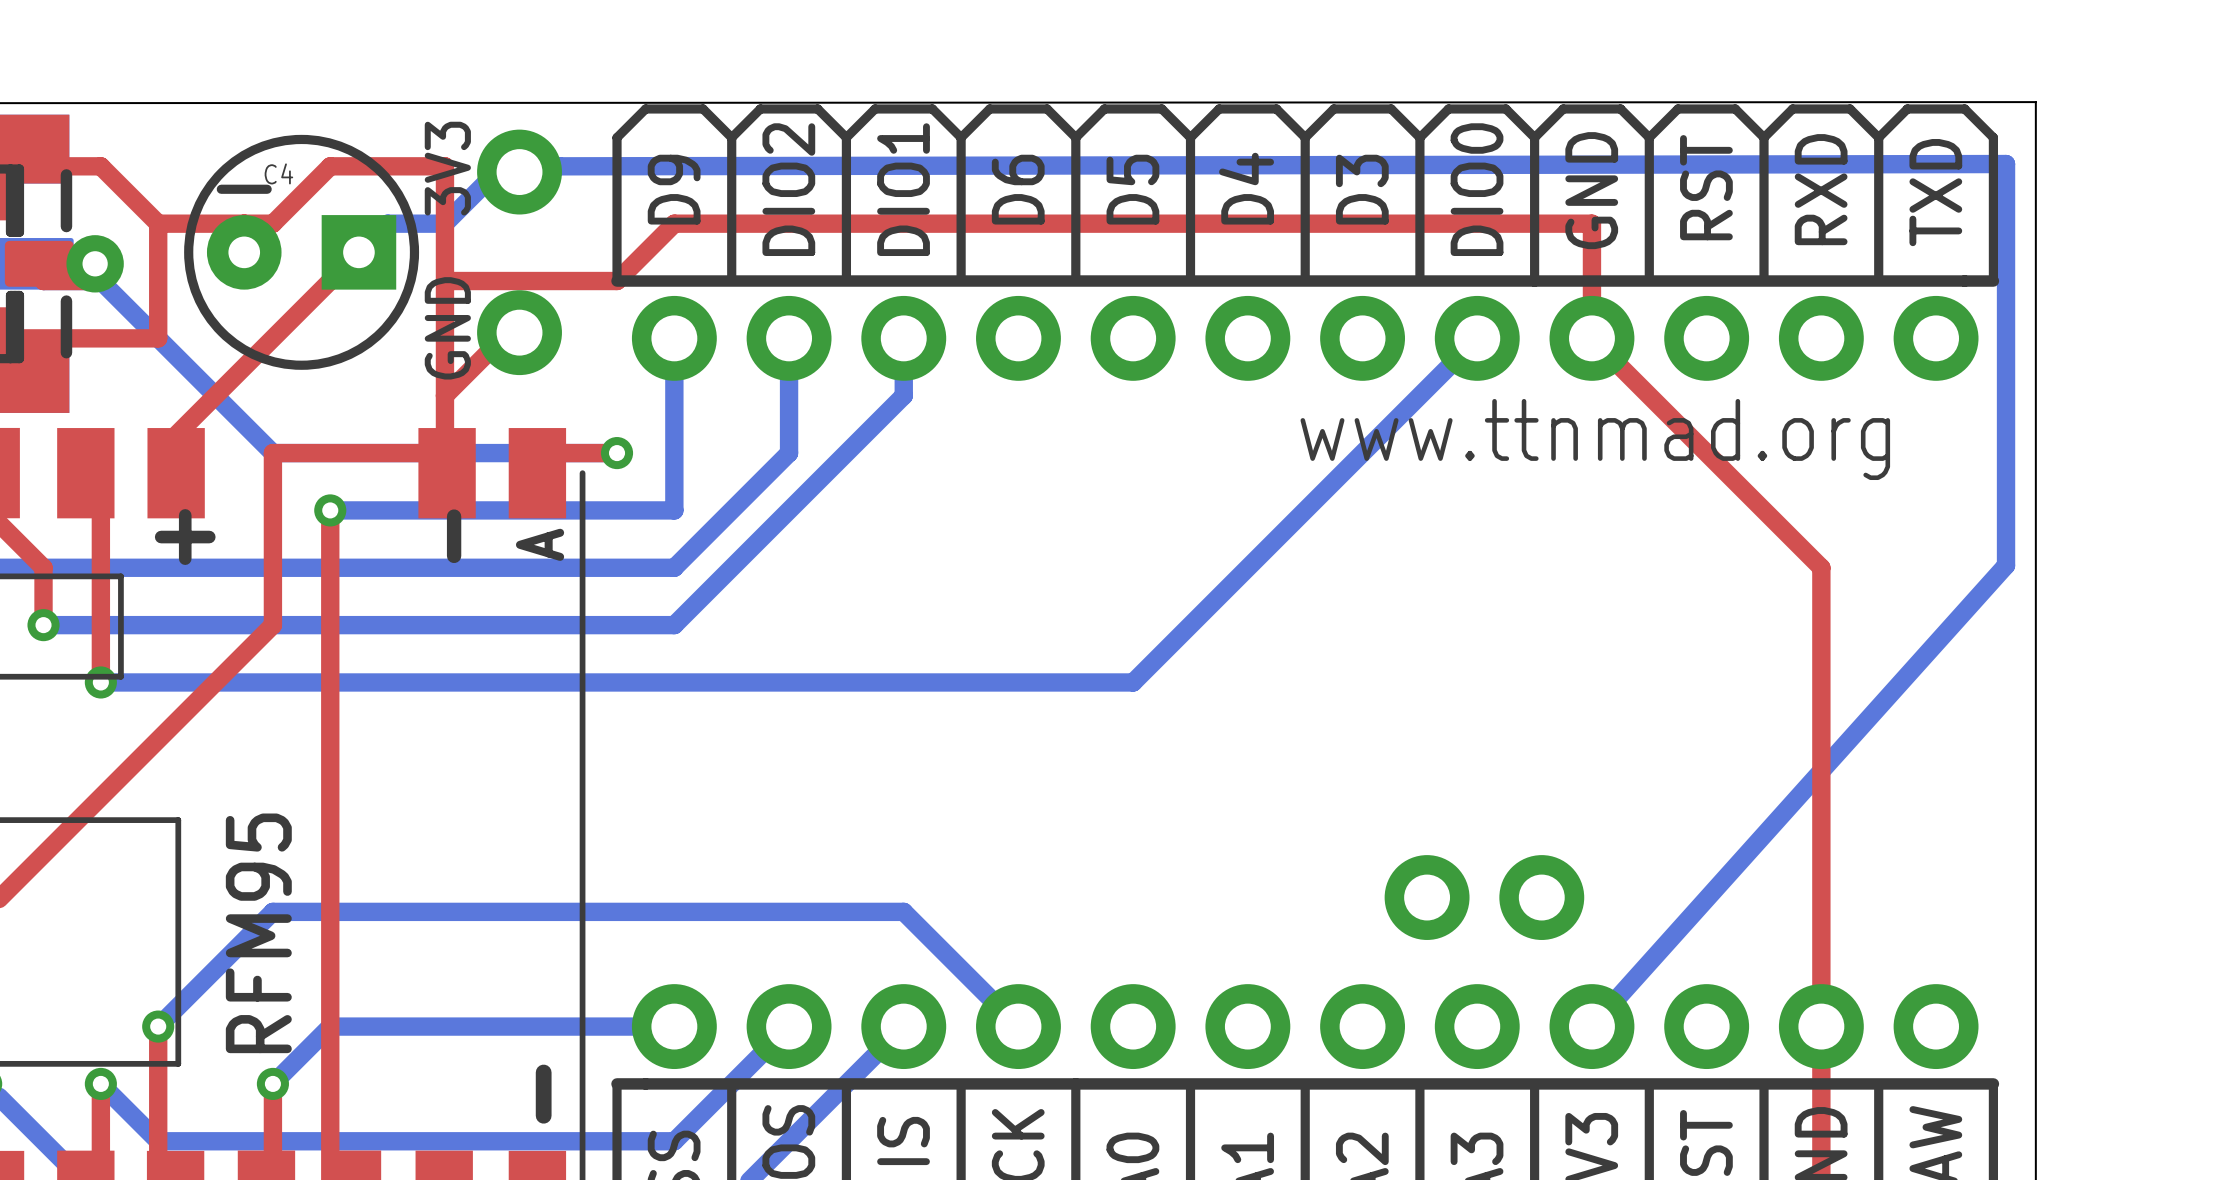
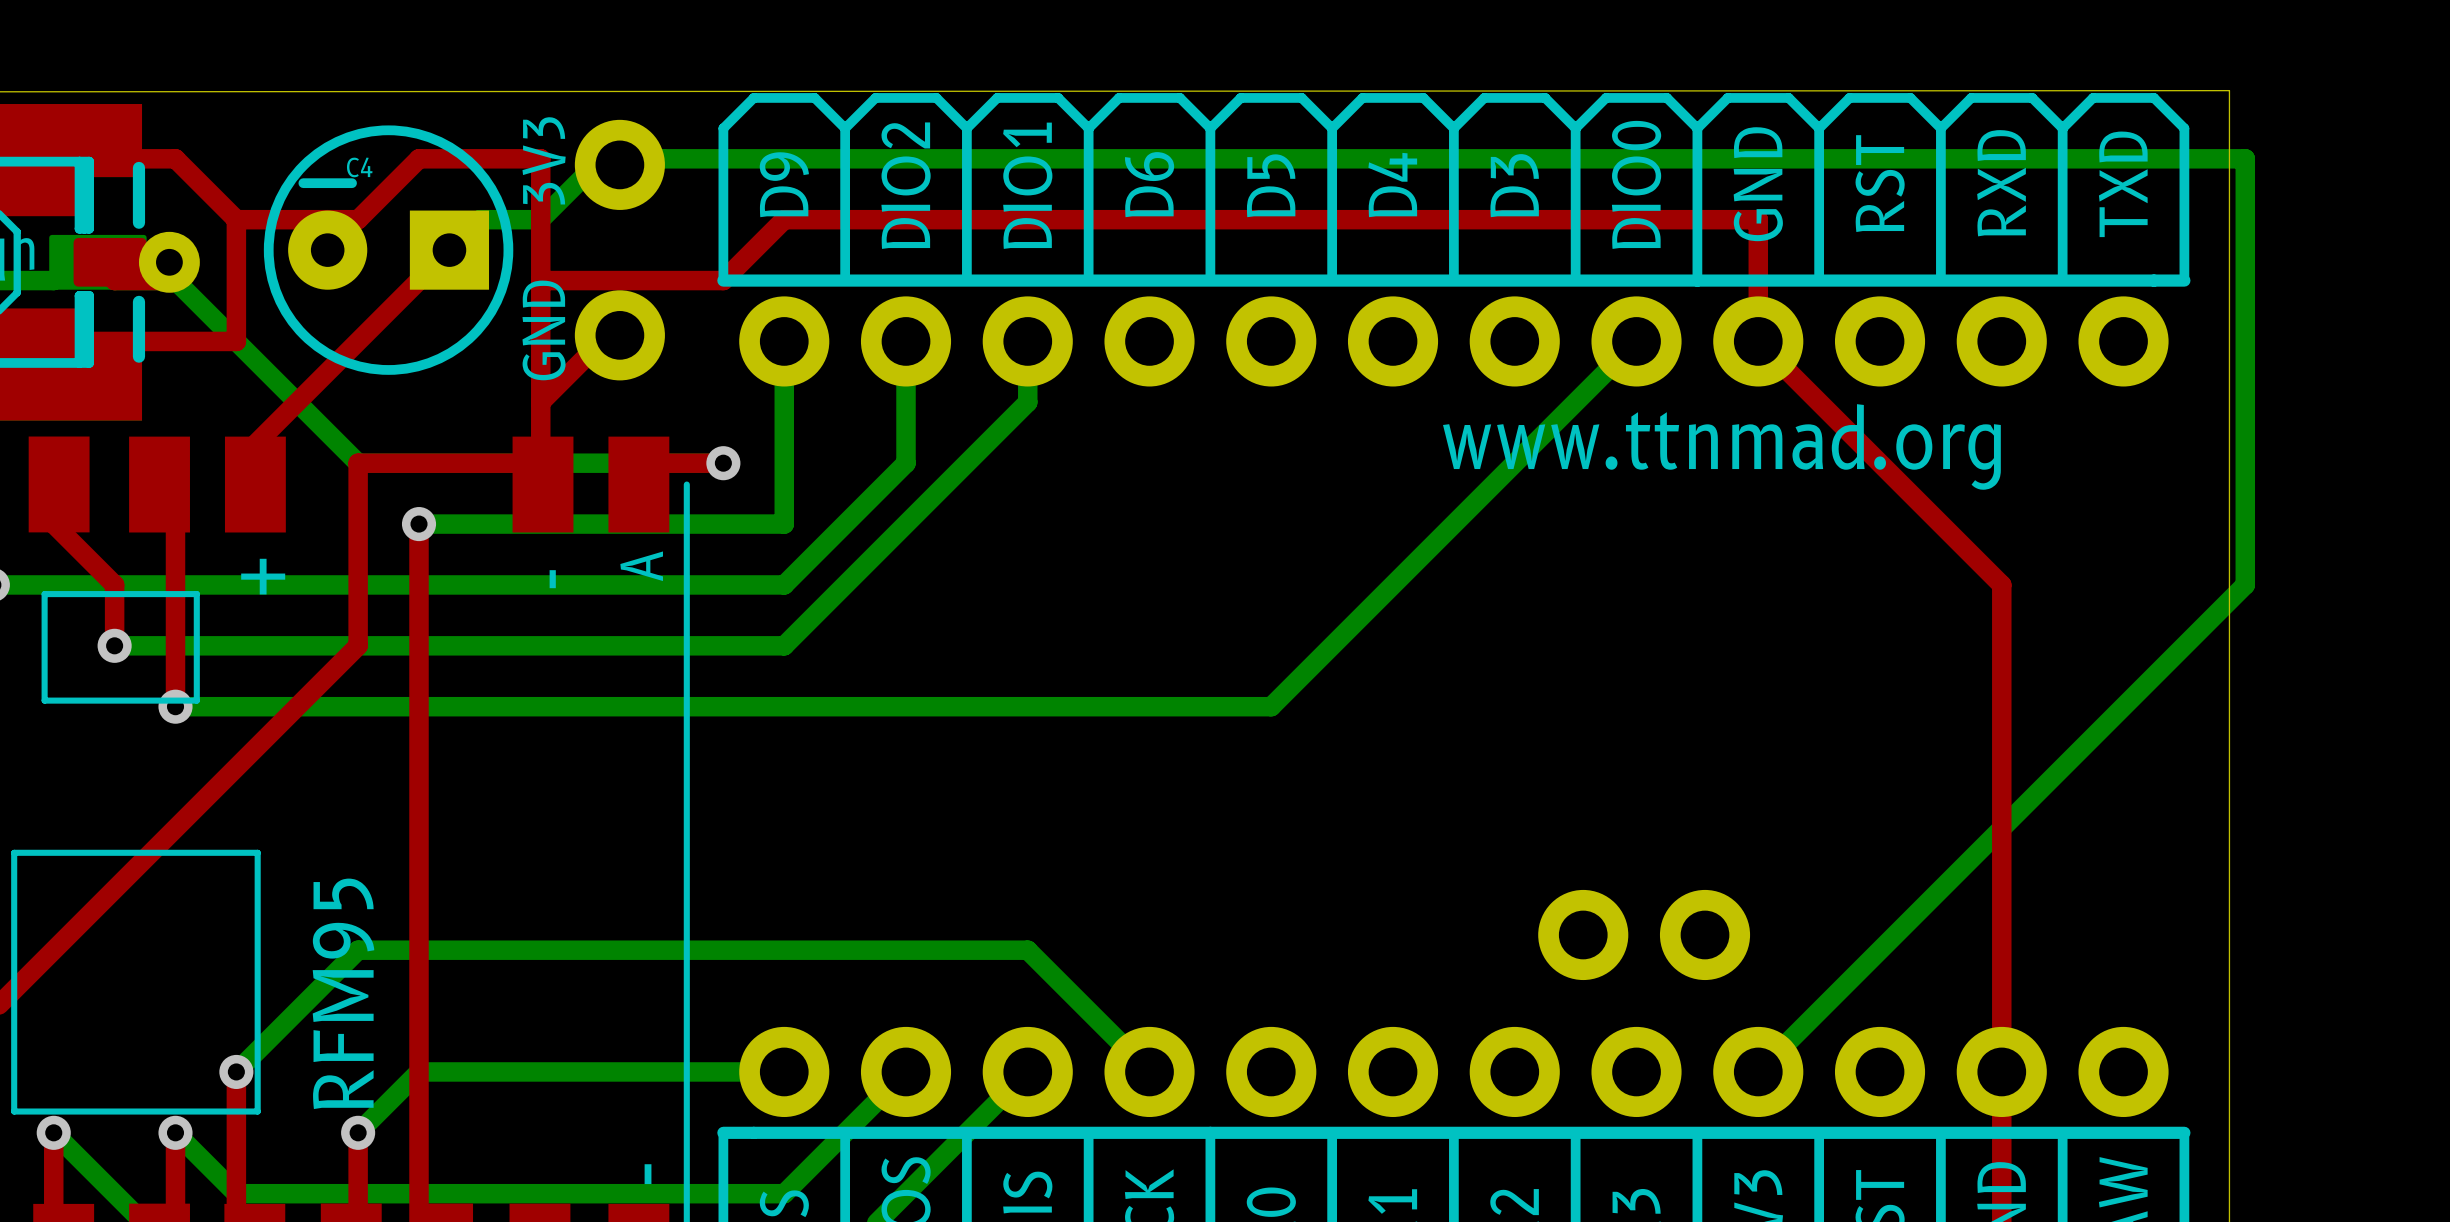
bottom track: (559, 166) (2006, 164) (2006, 565) (1591, 1026) -> (662, 158) (2245, 158) (2245, 584) (1758, 1071)

